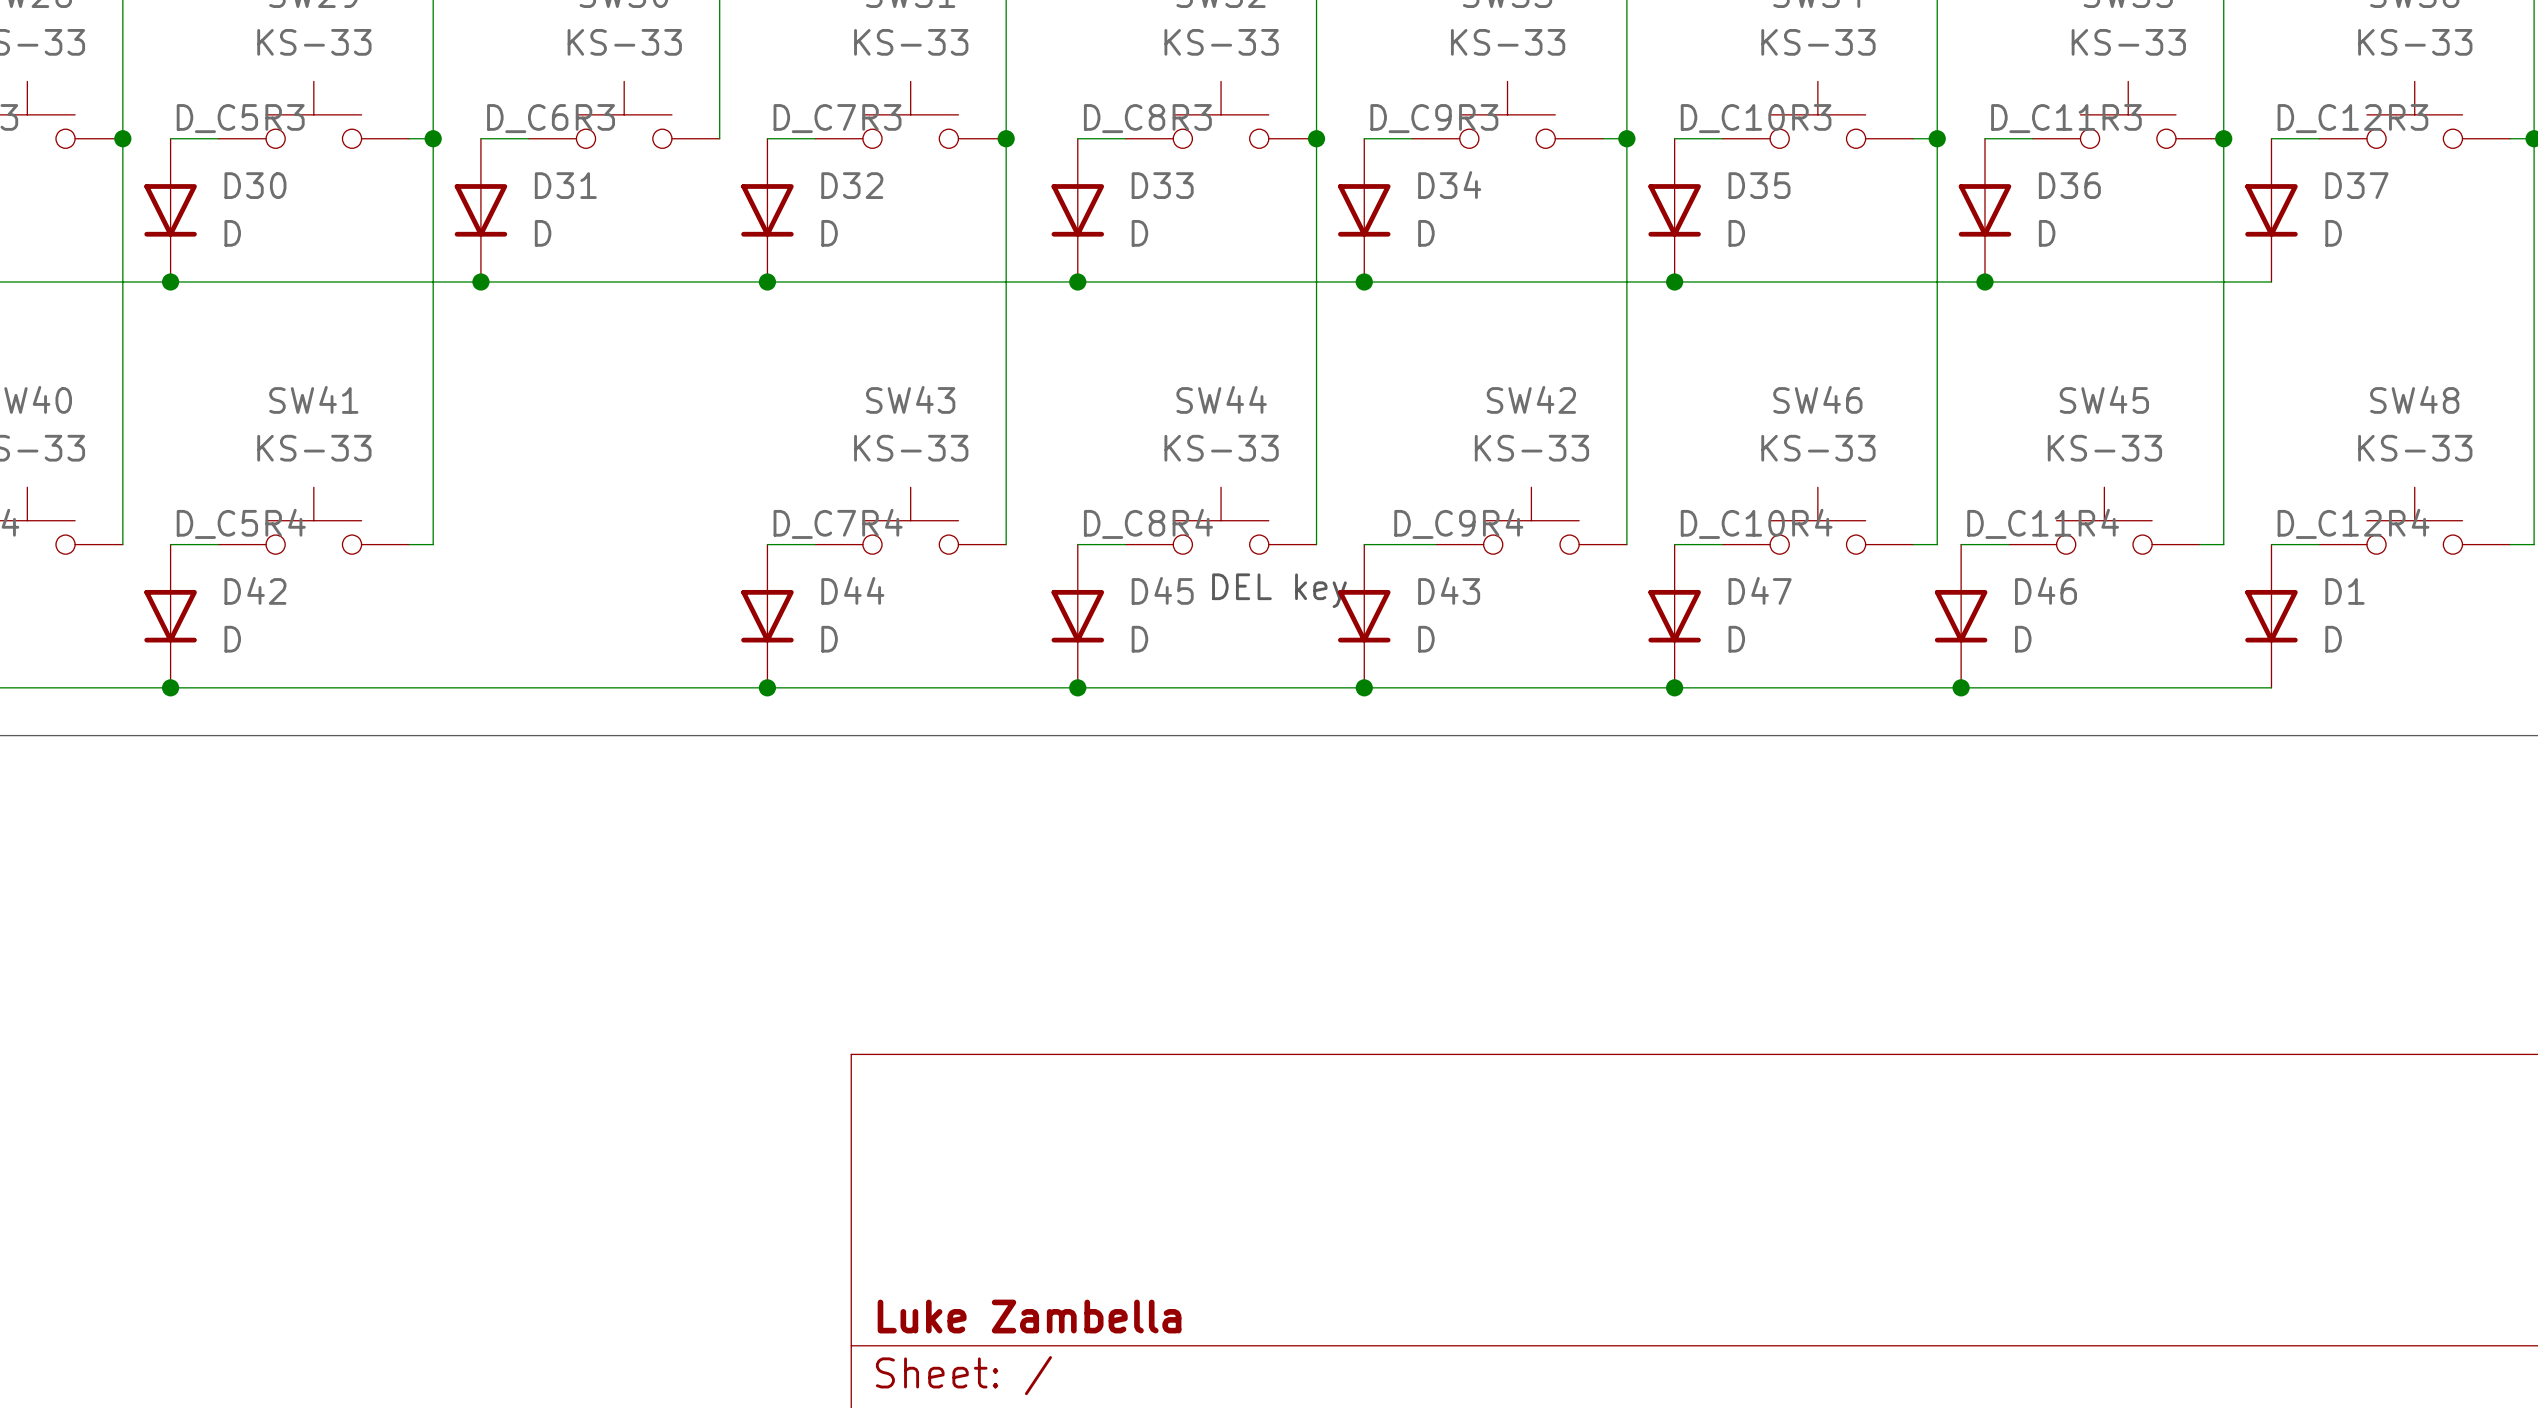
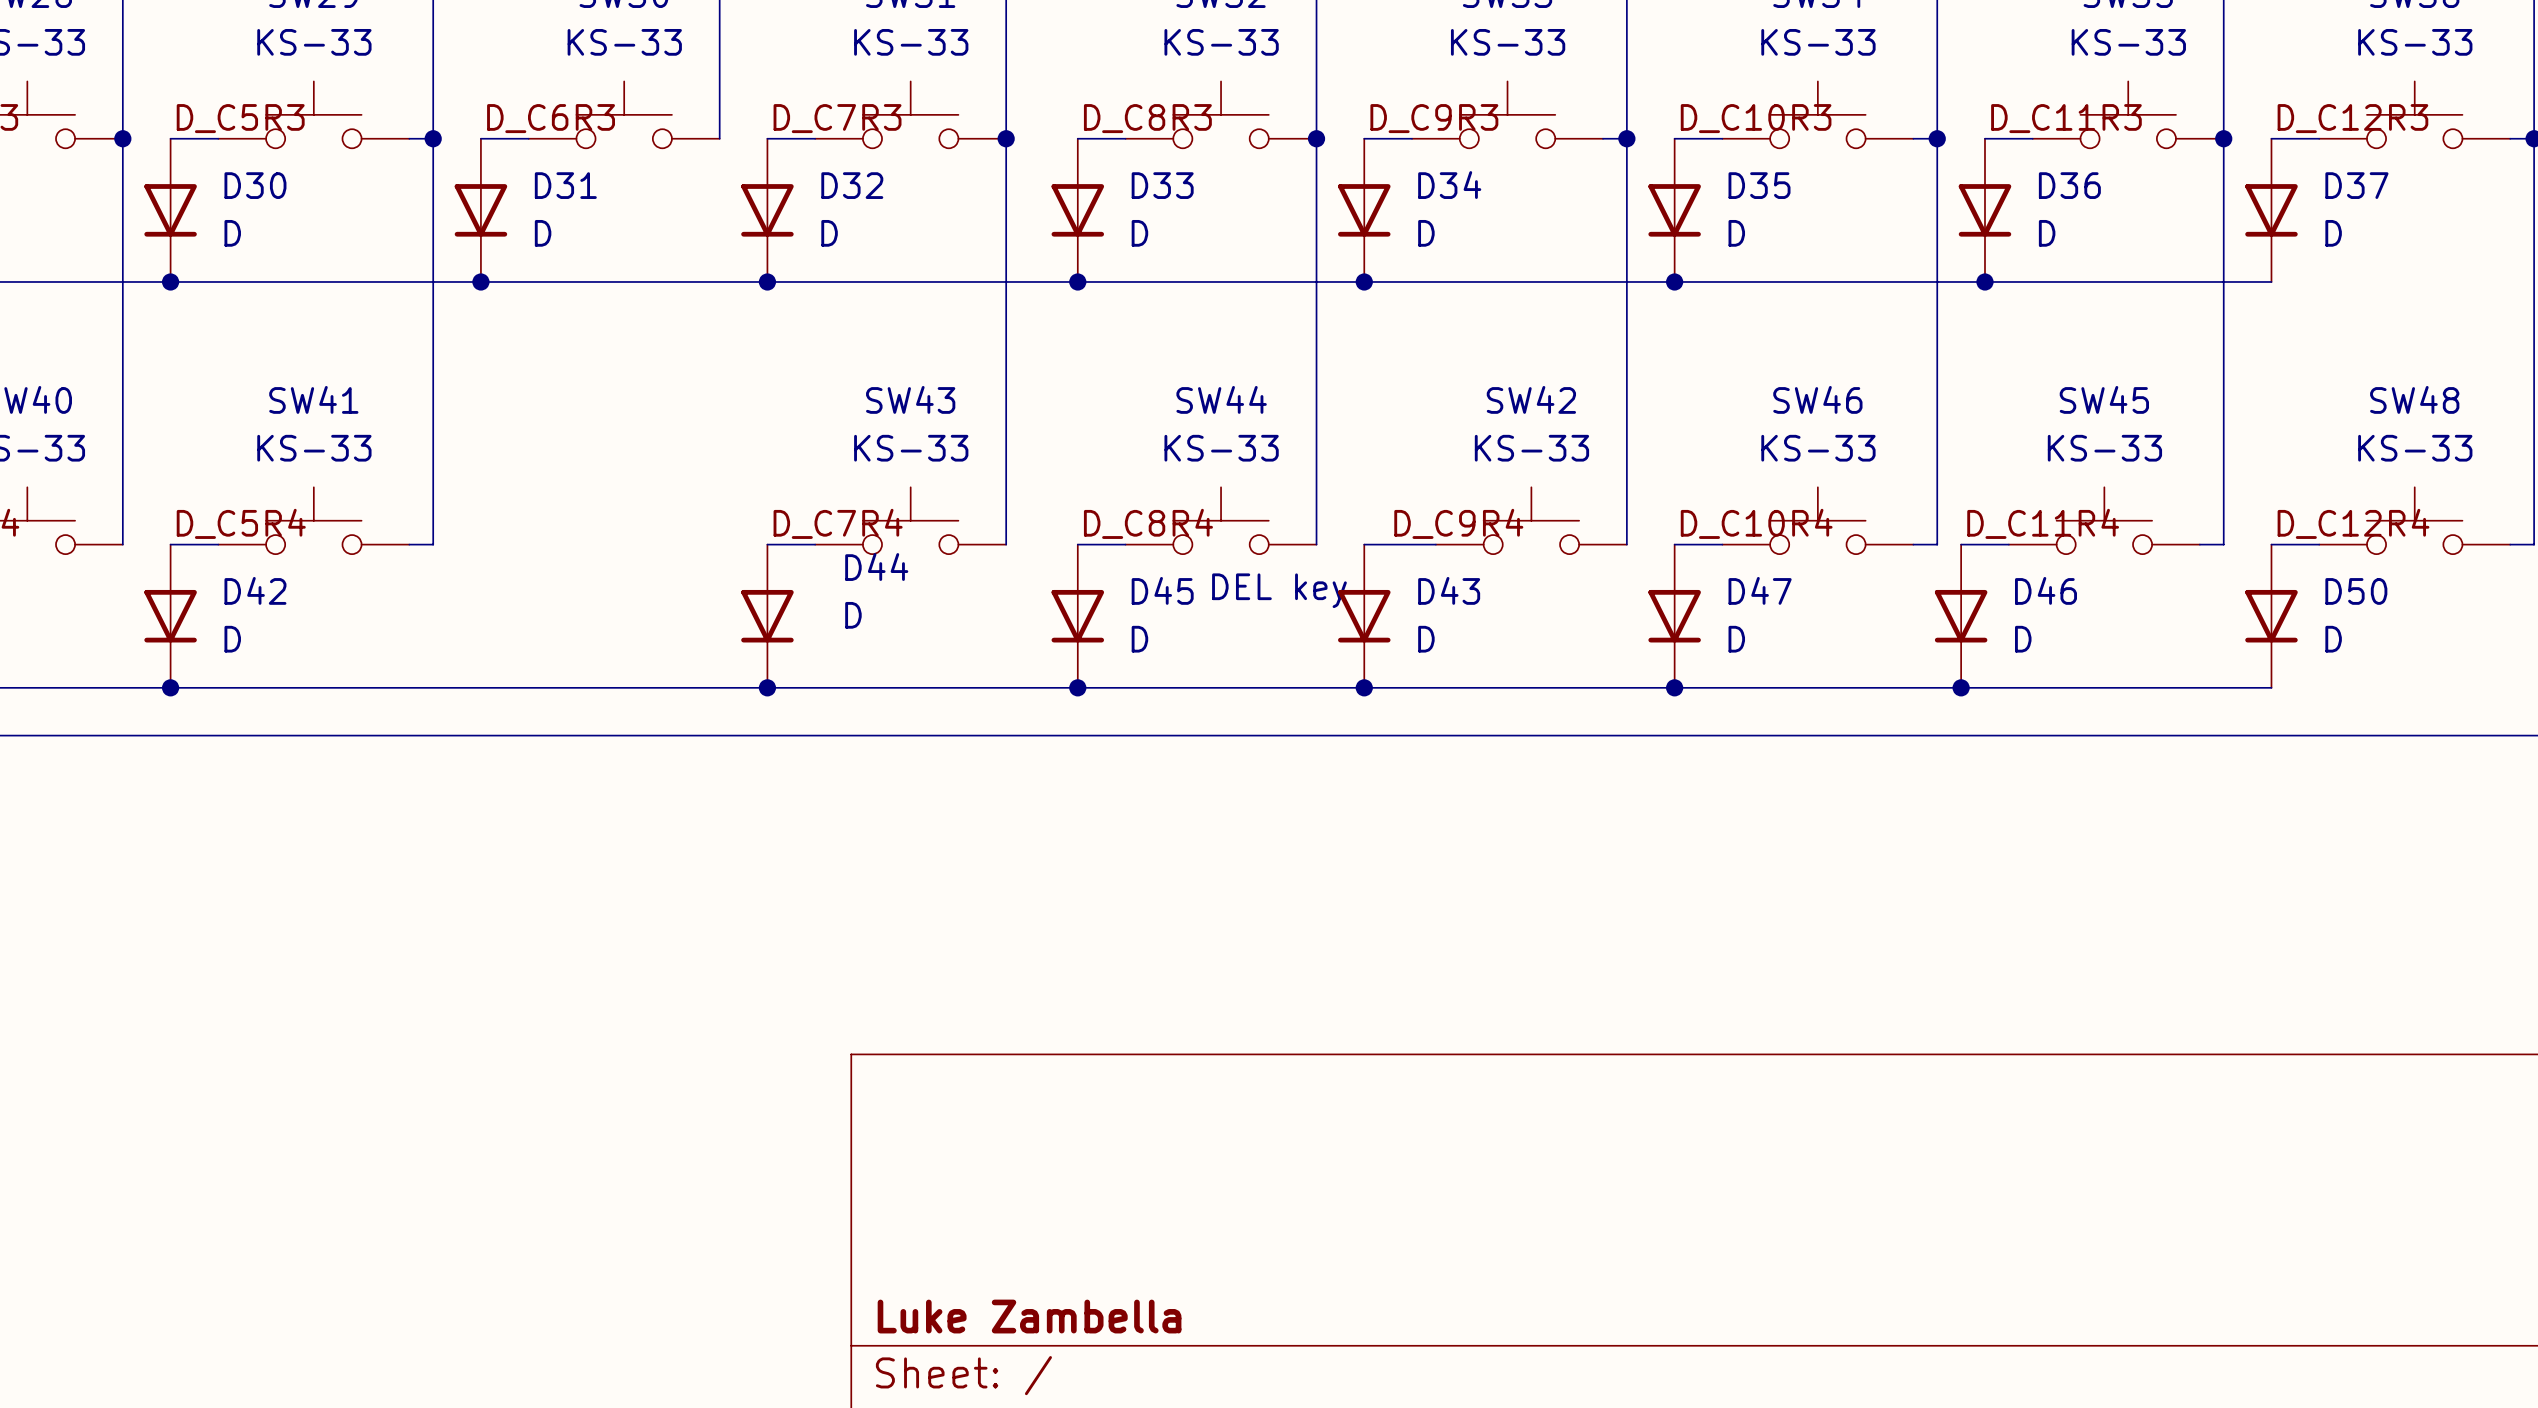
D44 name position: D44 (852, 590) -> D44 (876, 567)
D1 name: D1 (2344, 591) -> D50 (2356, 591)
D44 value position: D (829, 639) -> D (853, 615)

